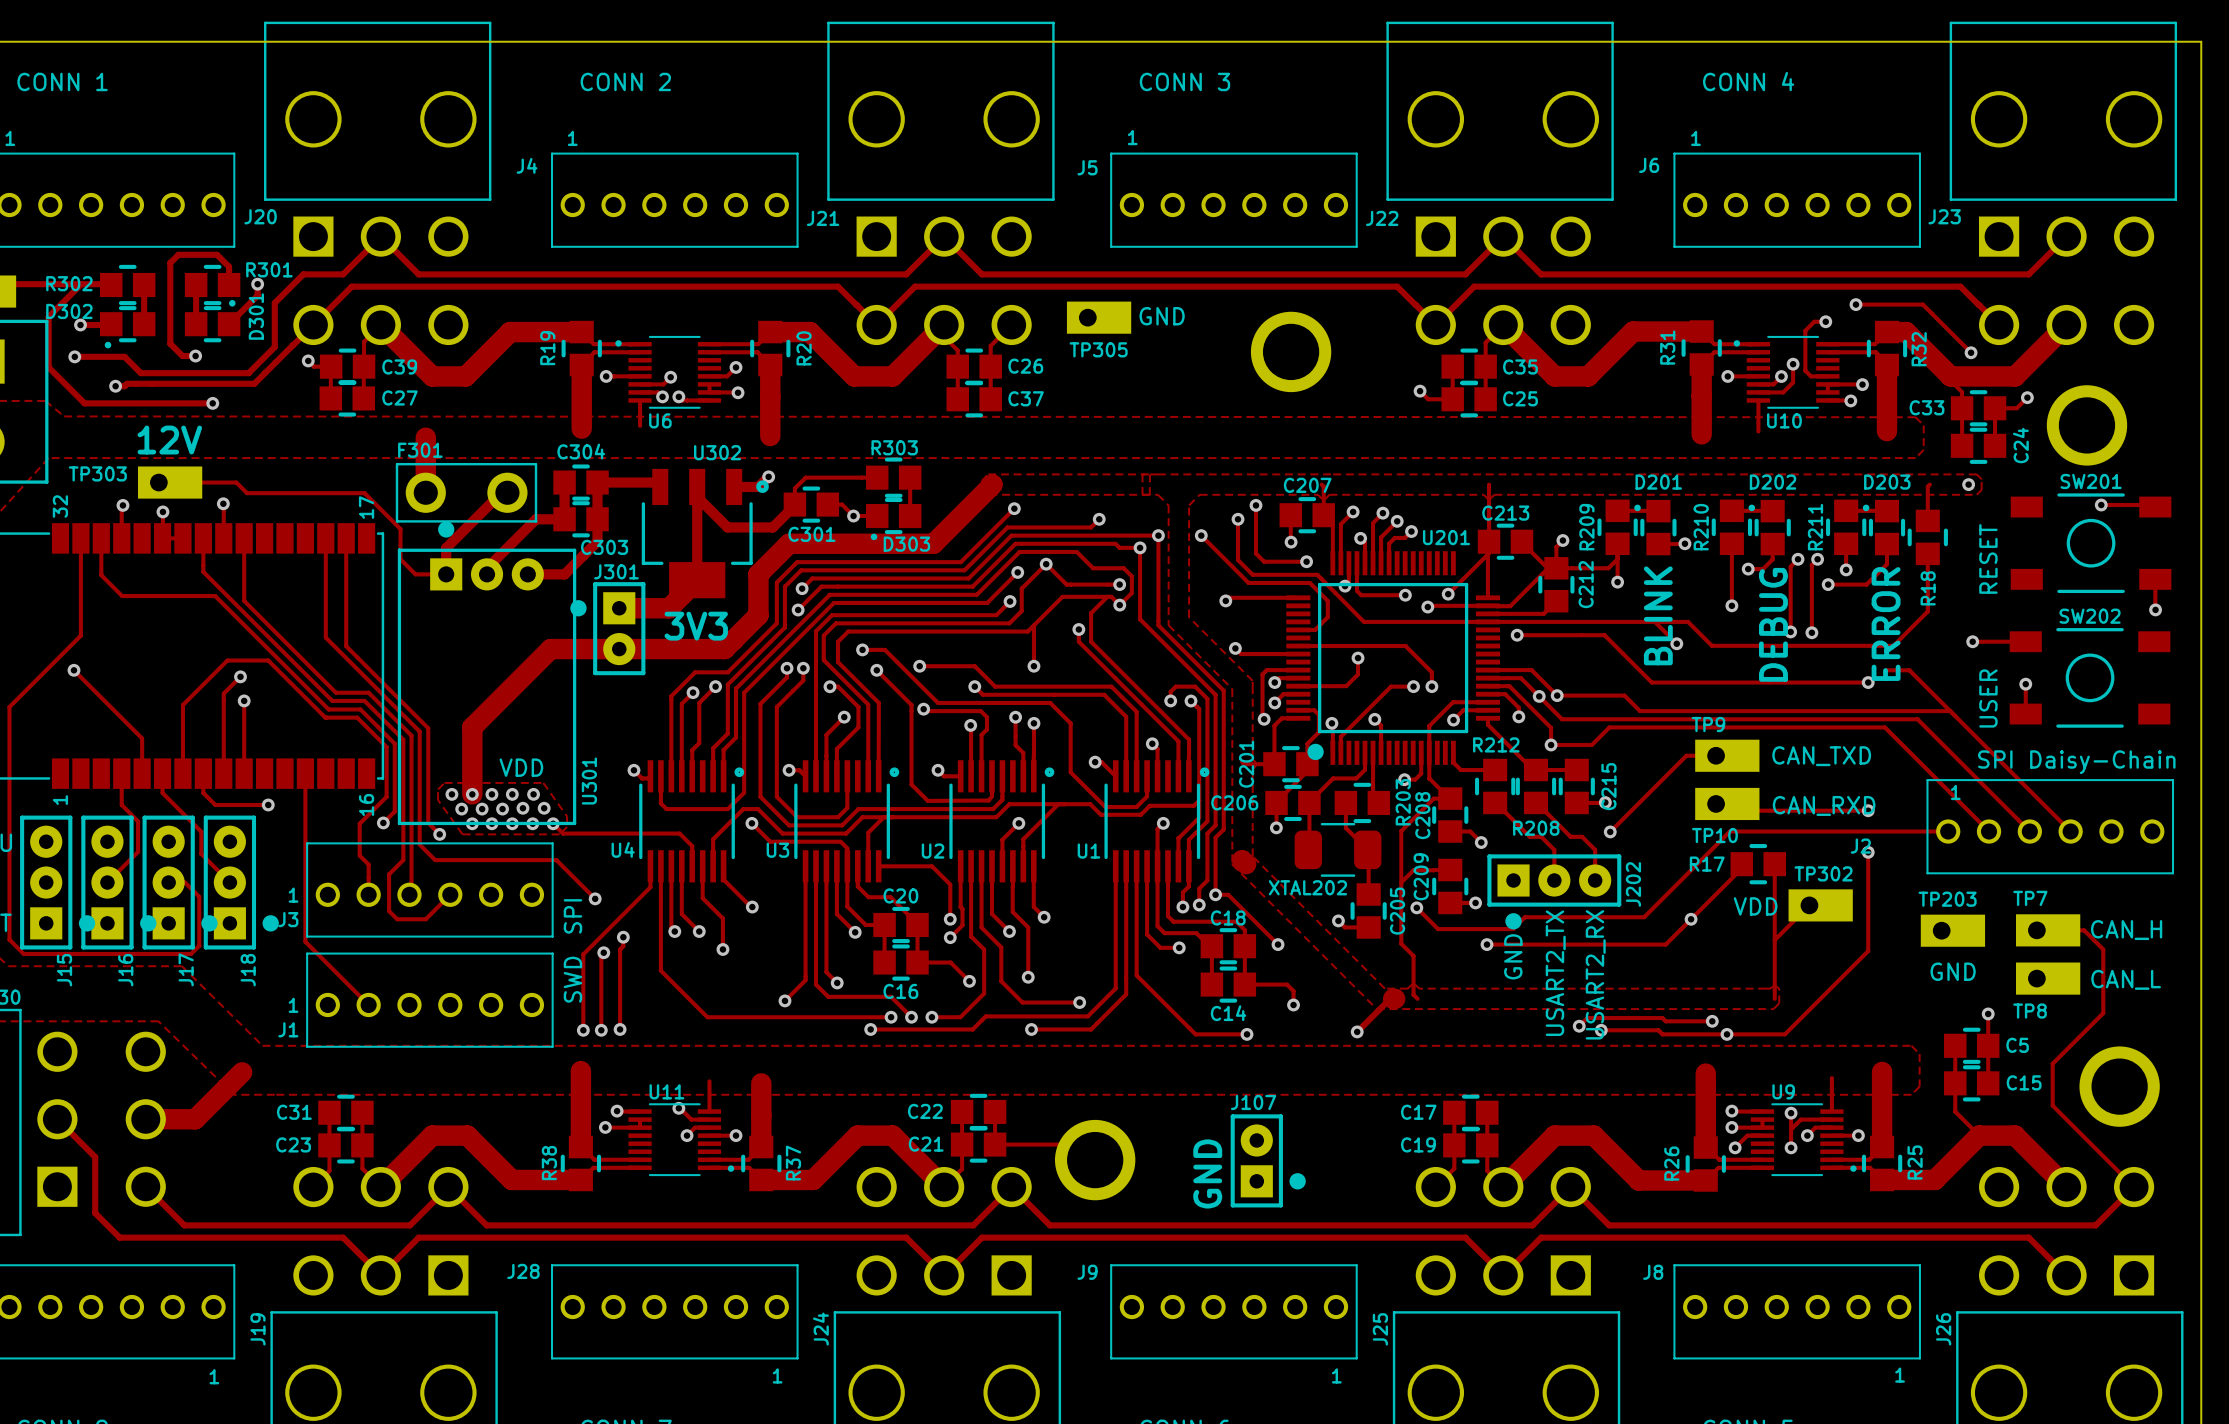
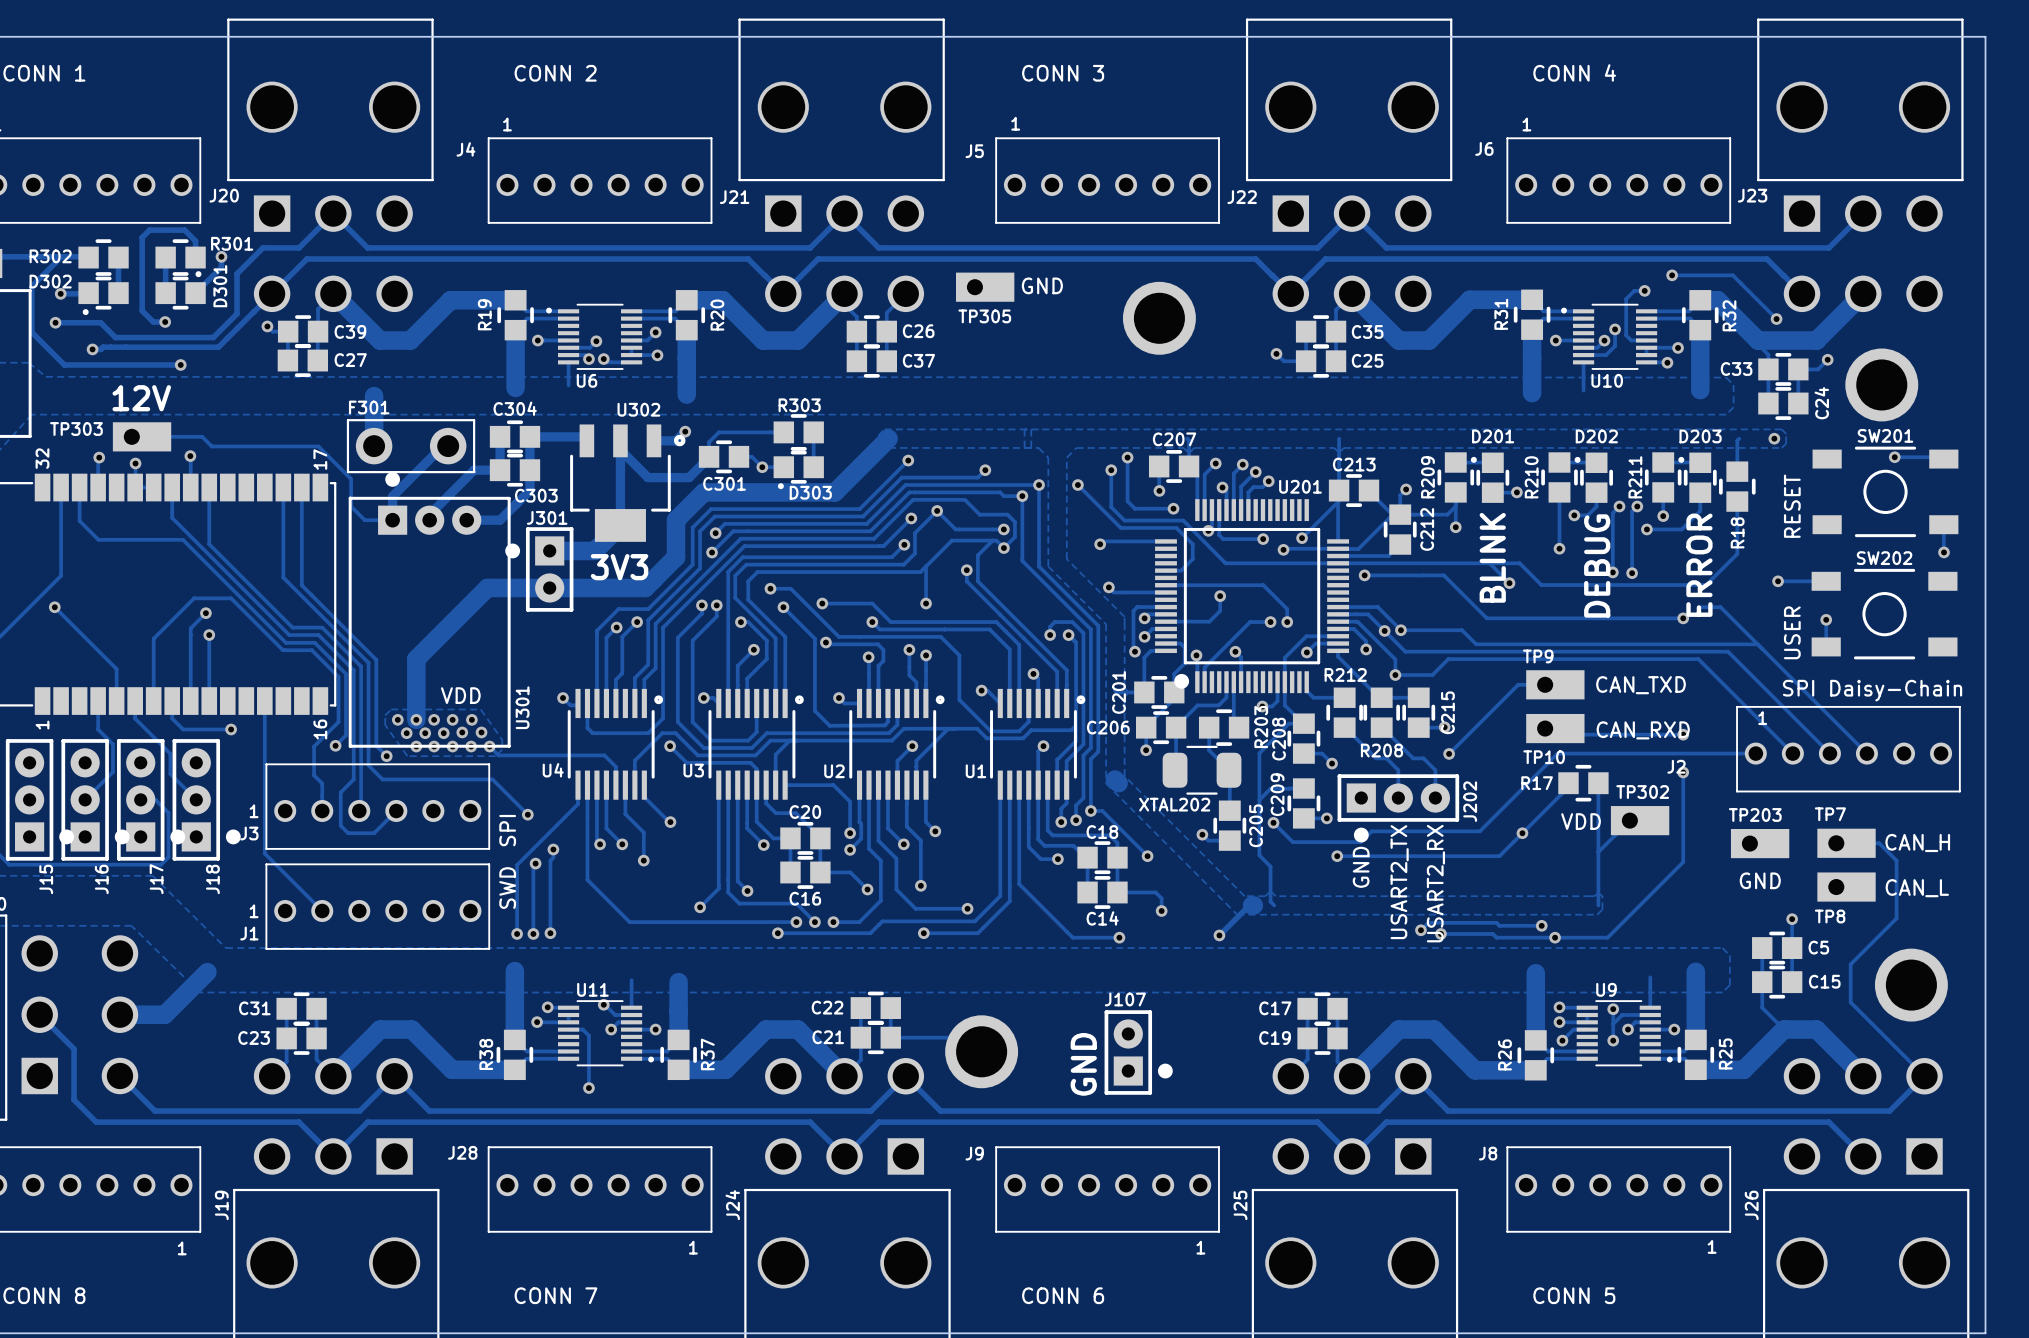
track: none -> (568, 1029) (582, 1029) (588, 1035) (588, 1088)
via: none -> (588, 1088)

